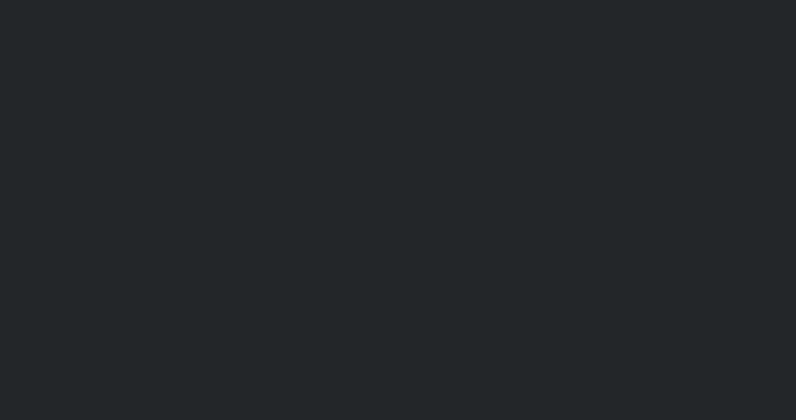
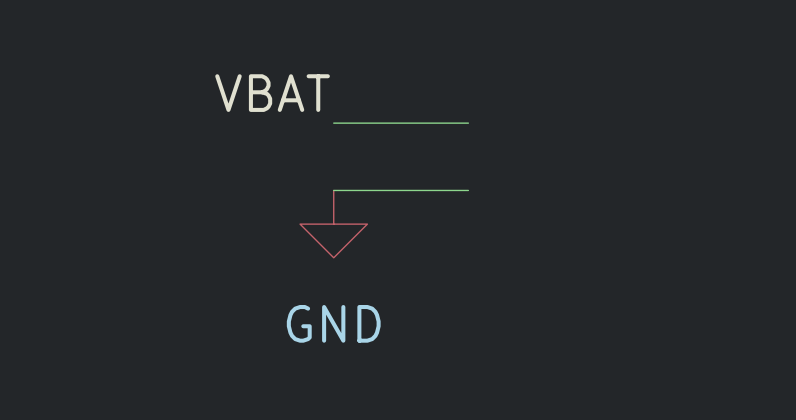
label: none -> VBAT (272, 93)
wire: none -> (333, 123) (468, 123)
wire: none -> (333, 190) (468, 190)
power symbol: none -> GND (333, 224)

